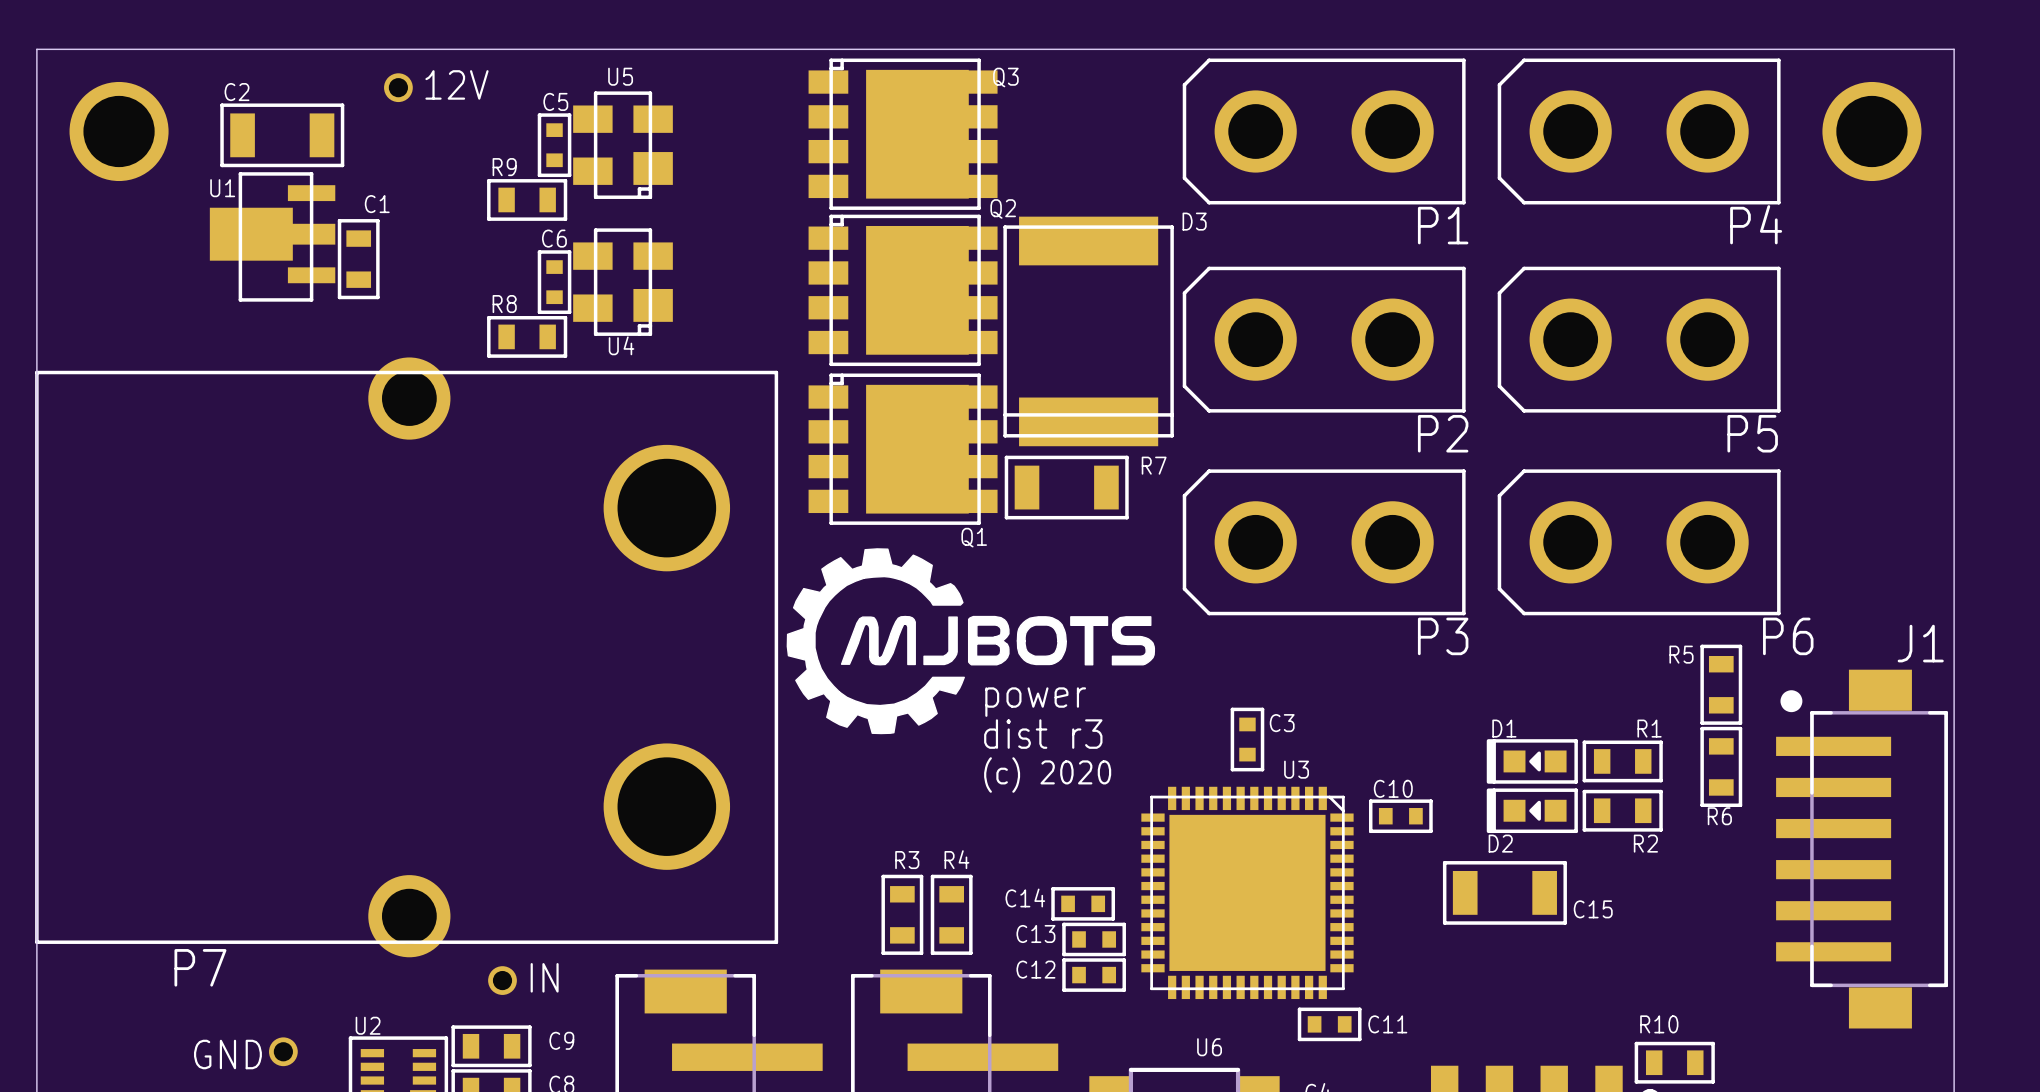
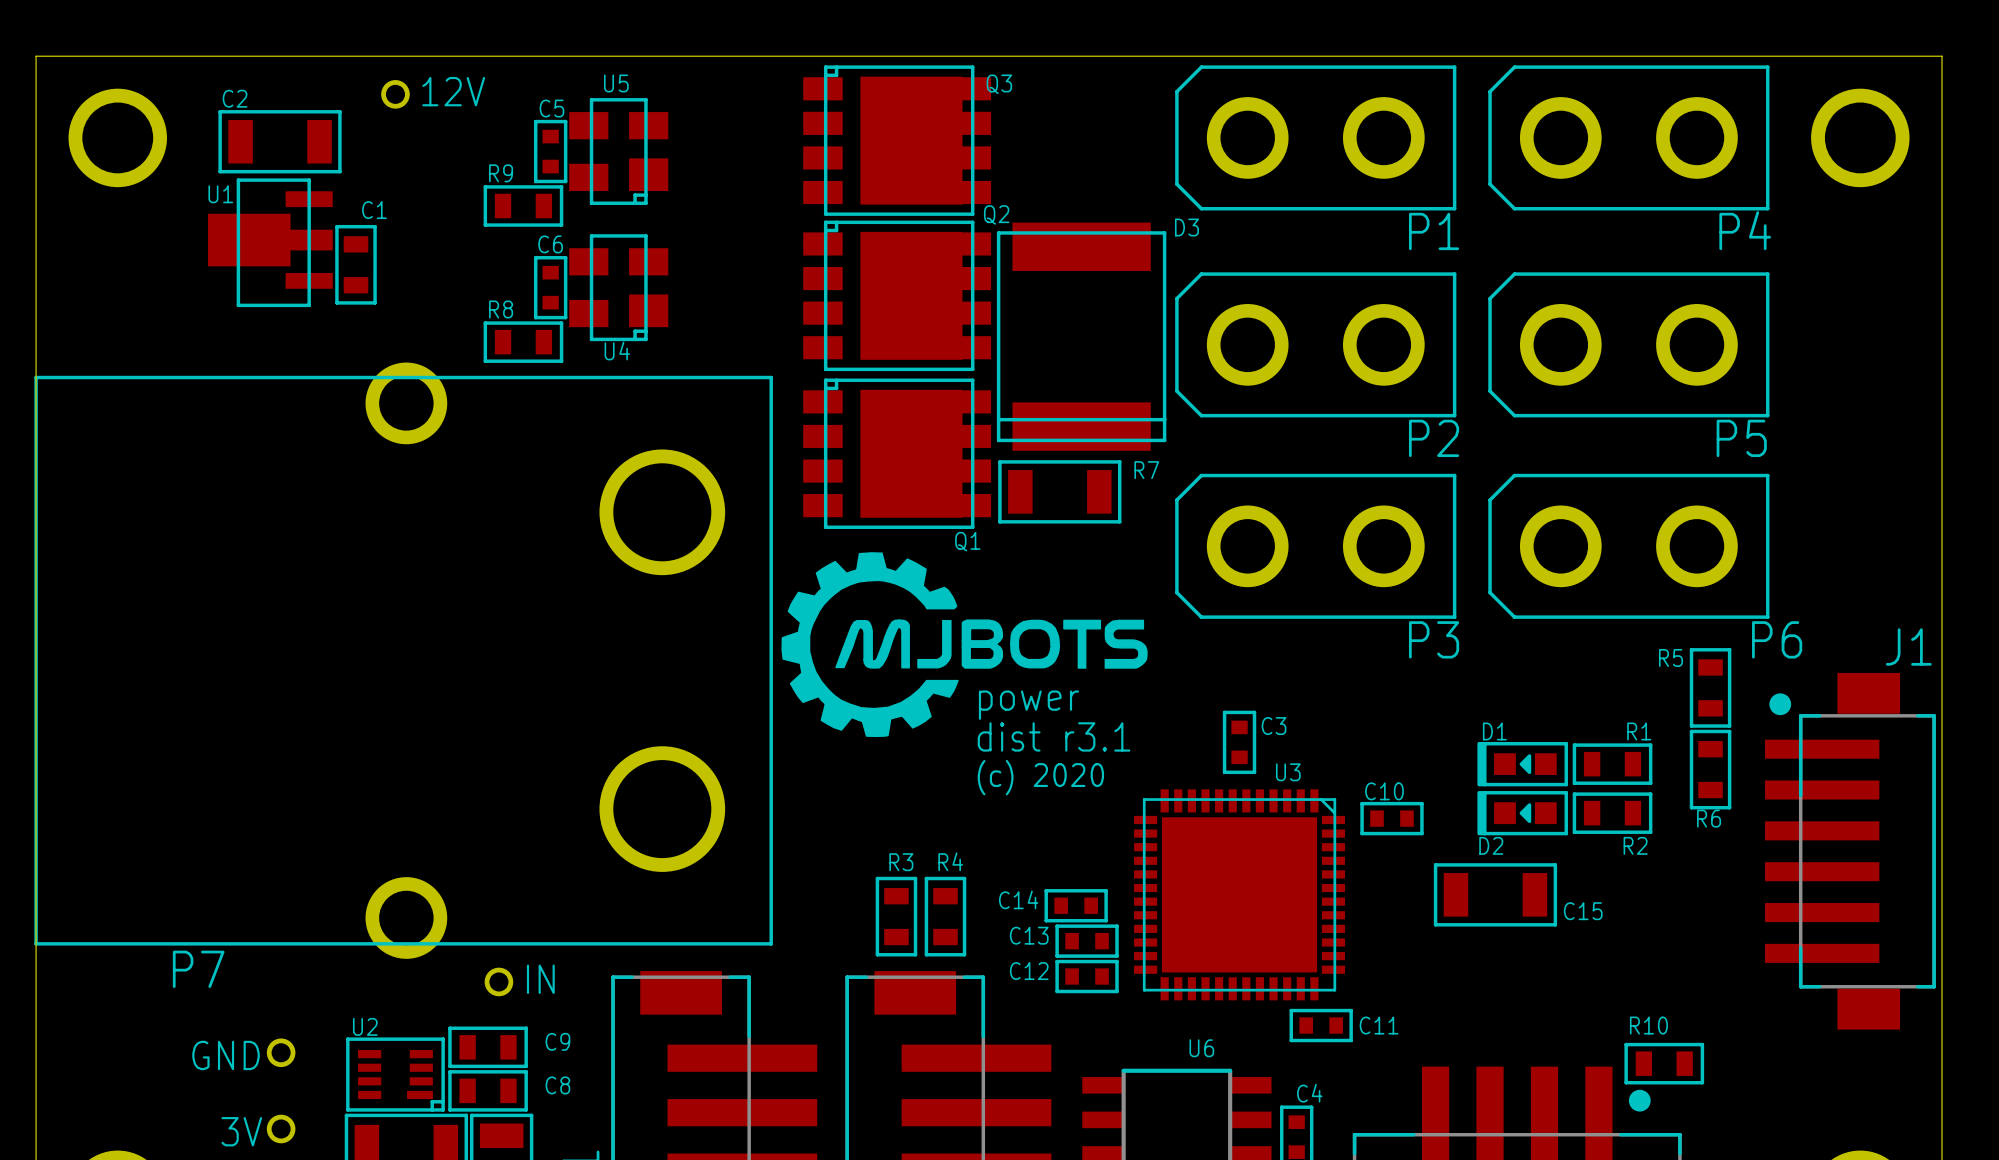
text: dist r3 (1043, 734) -> dist r3.1 (1054, 736)

